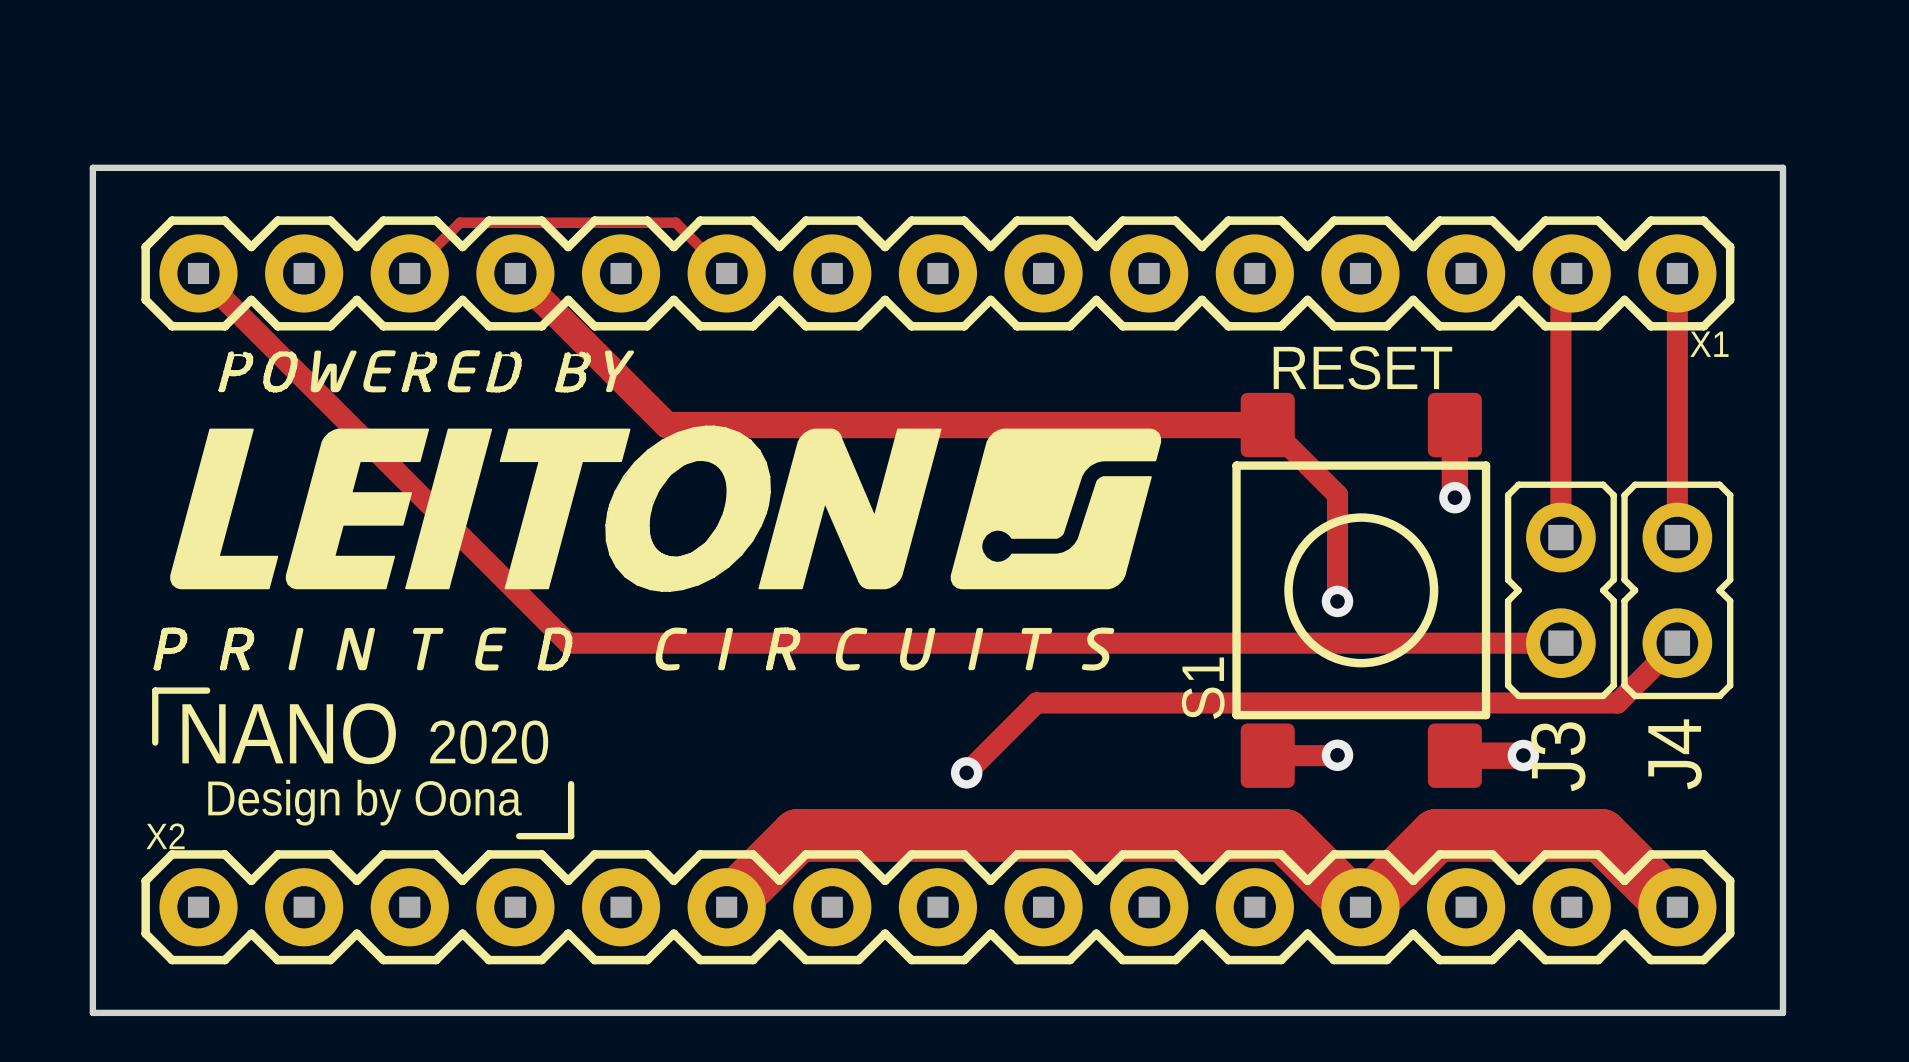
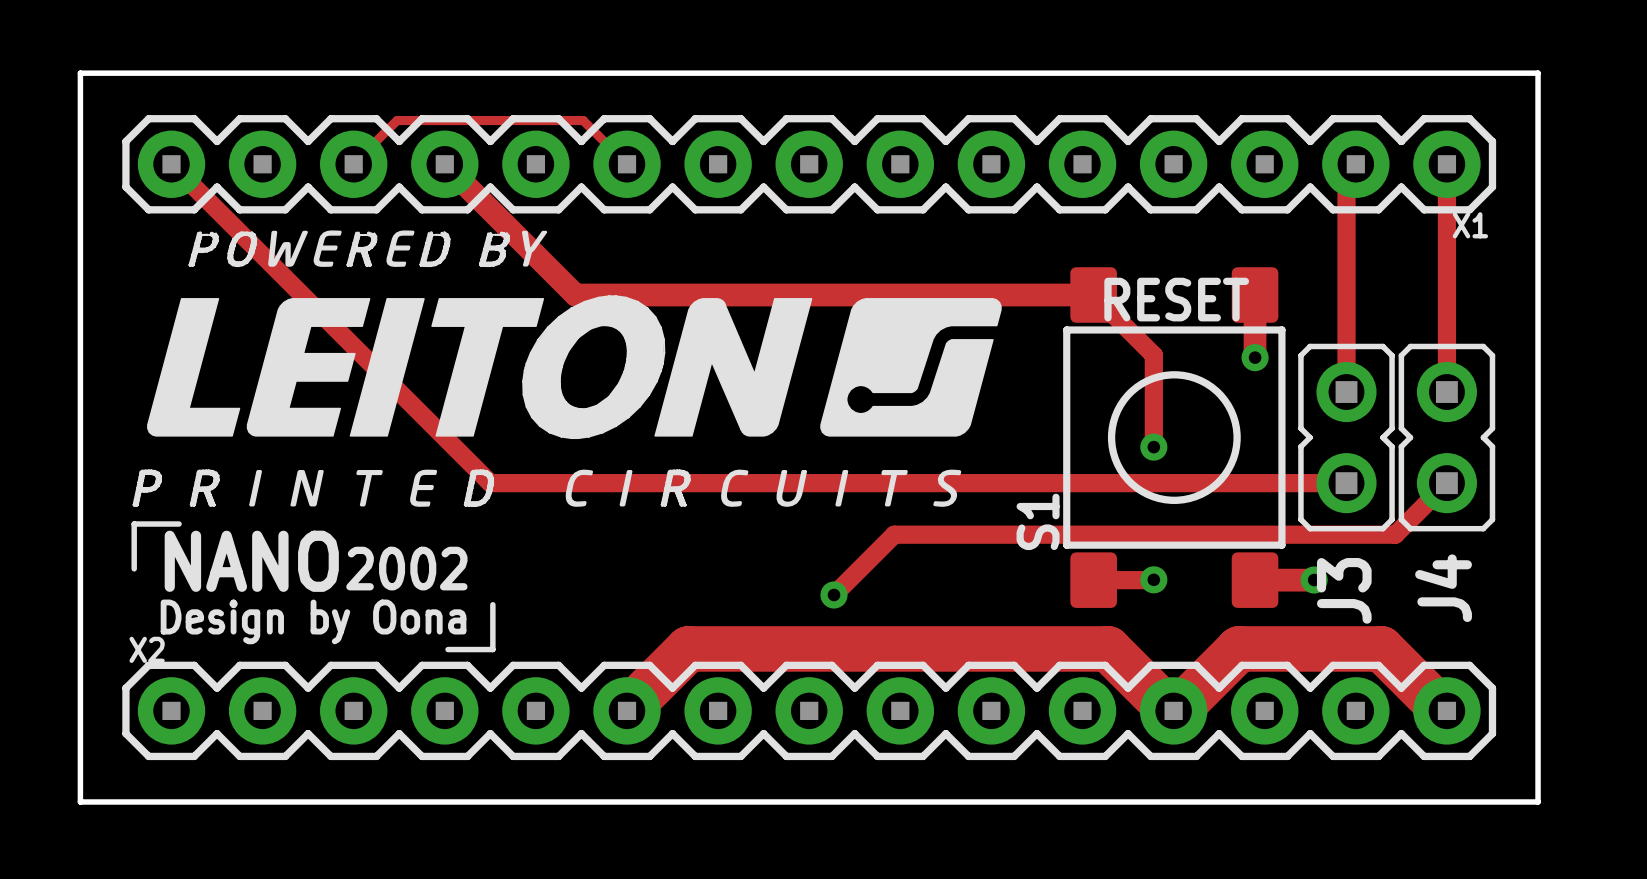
text position: RESET (1362, 367) -> RESET (1176, 299)
text: 2020 (489, 742) -> 2002 (406, 568)

